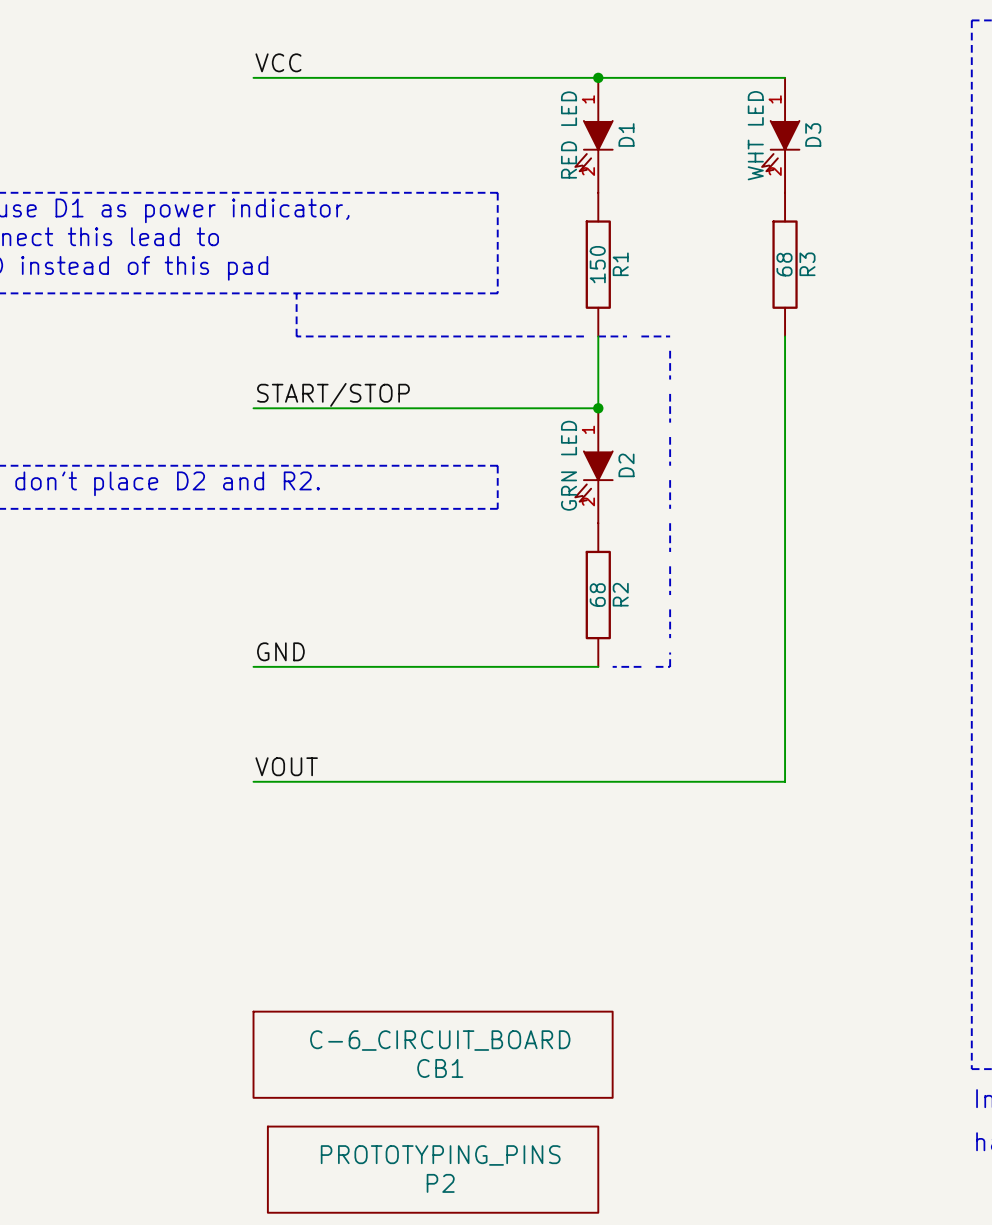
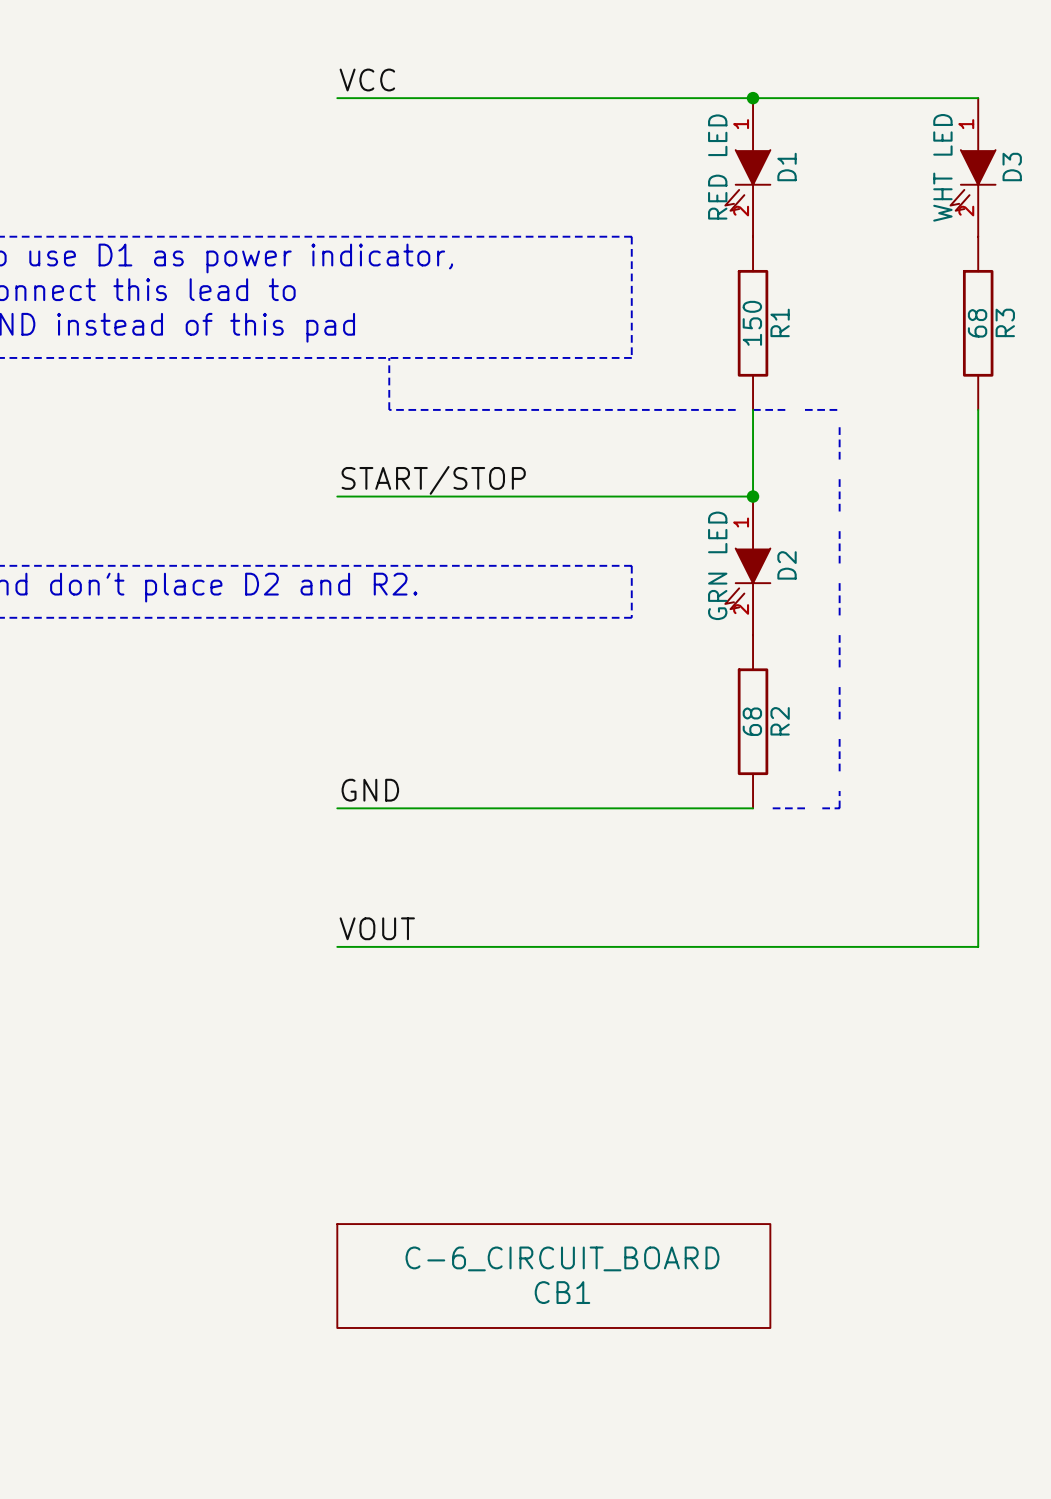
P2: PROTOTYPING_PINS (433, 1169) -> none

